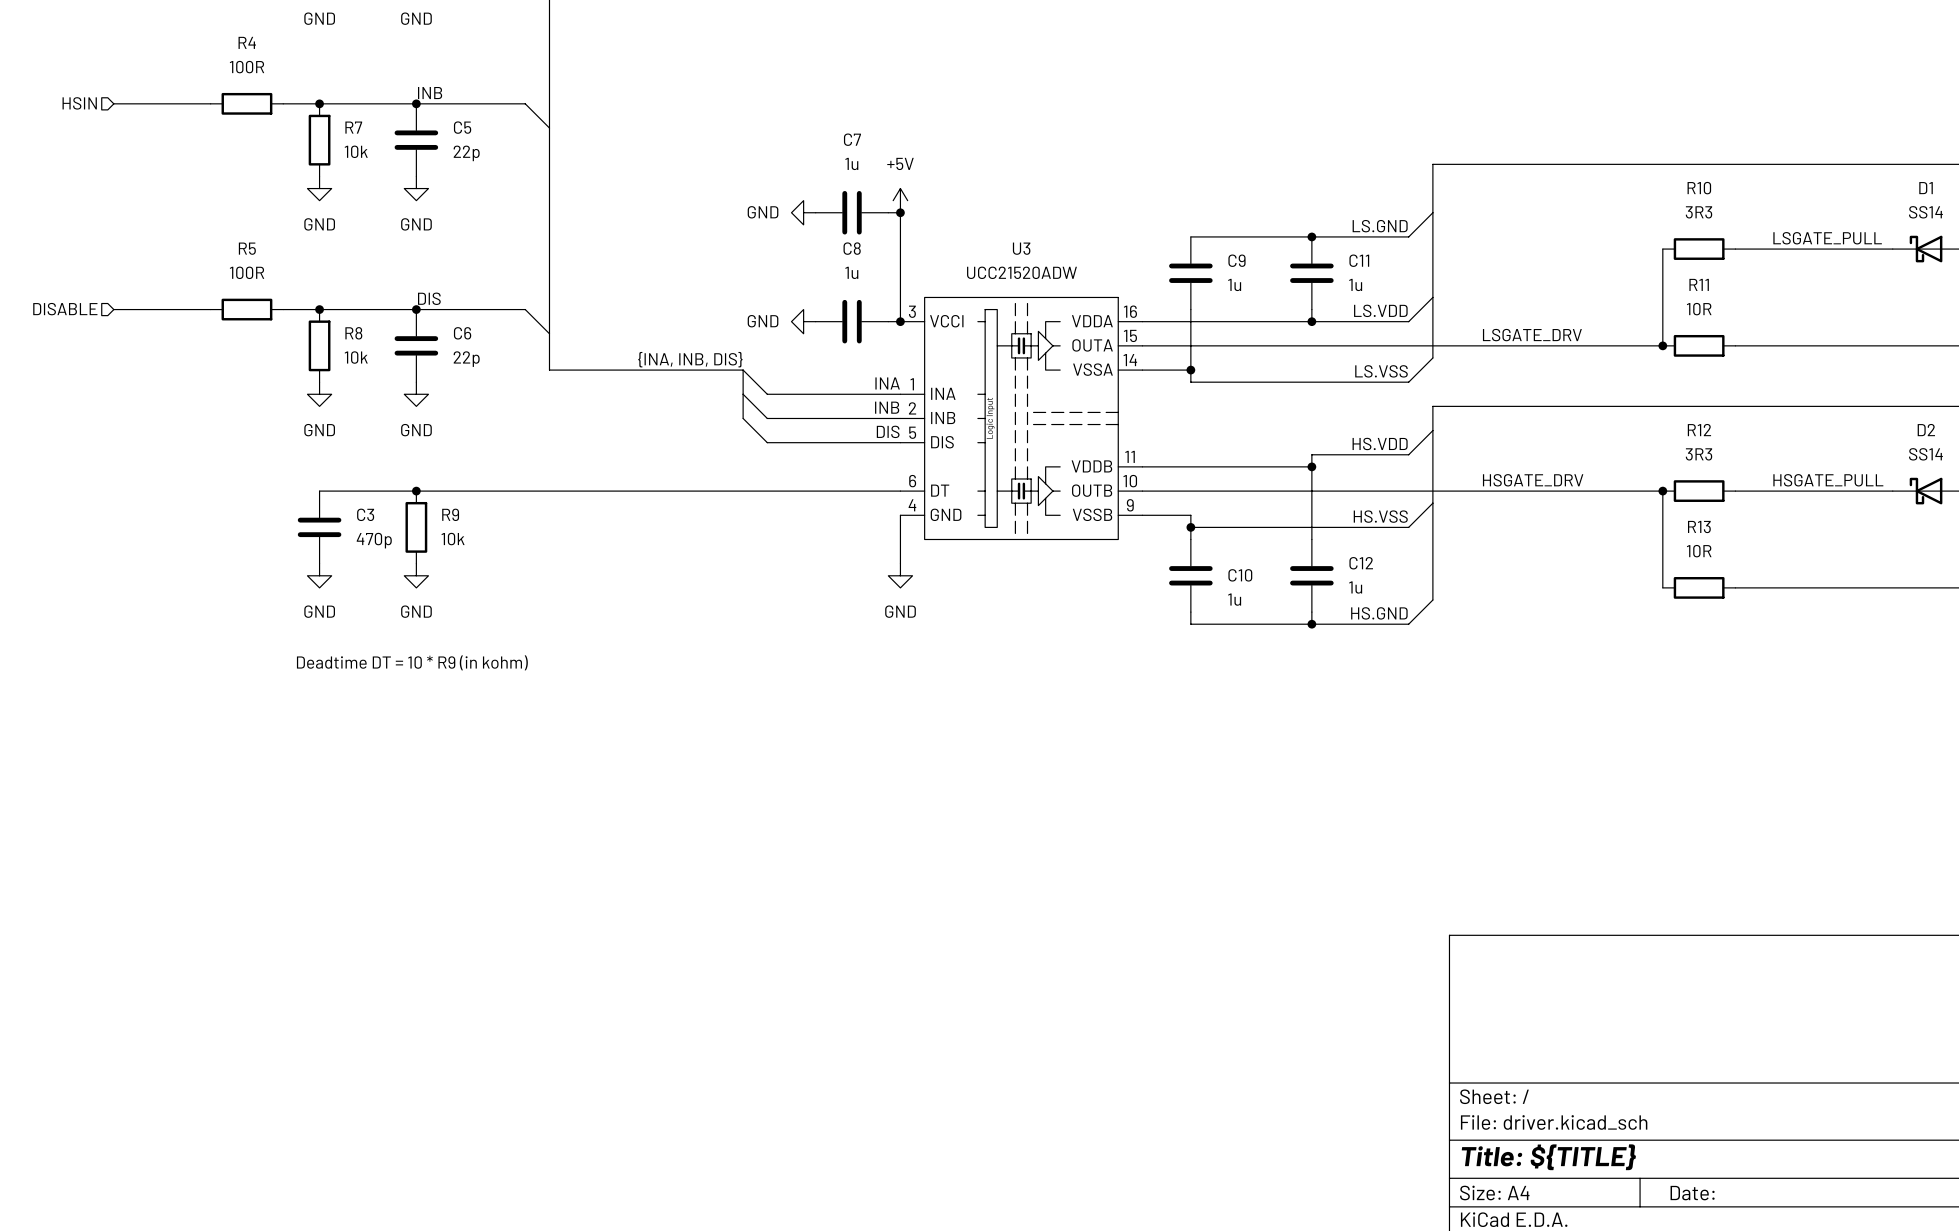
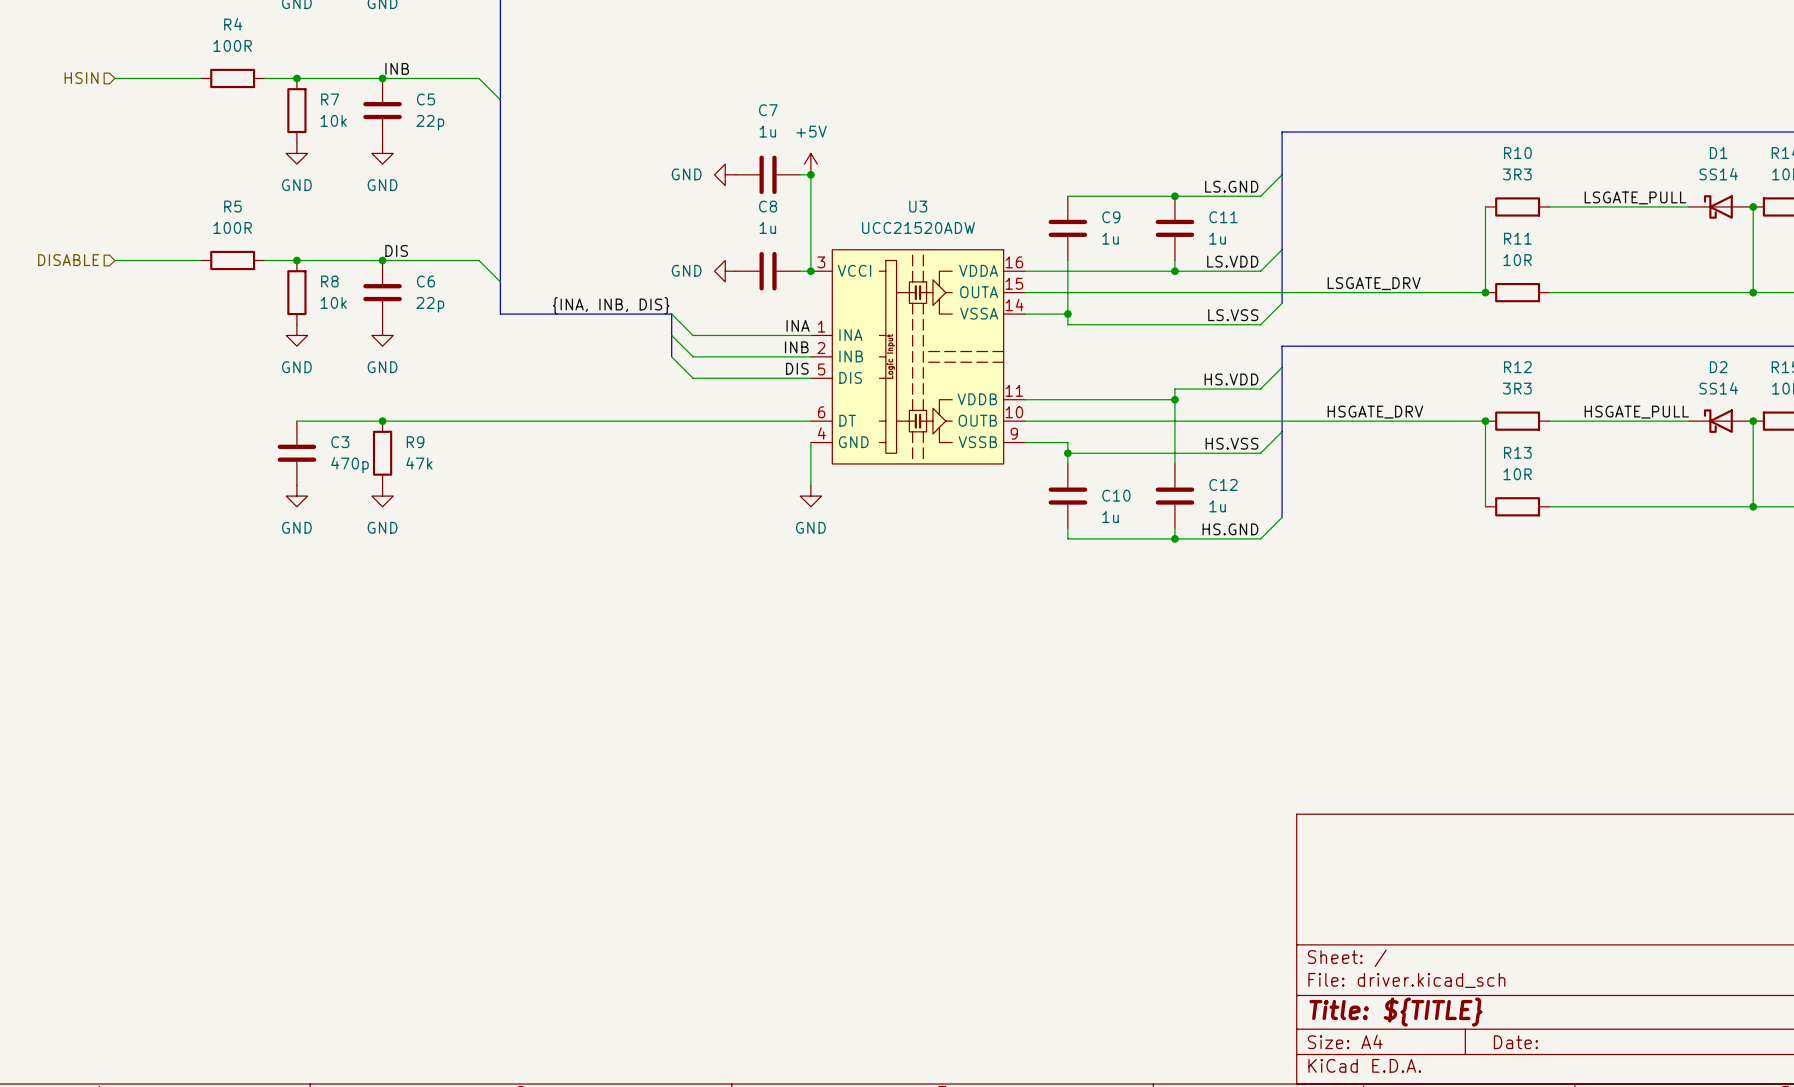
R9 value: 10k (453, 539) -> 47k (419, 463)
text: Deadtime DT = 10 * R9 (in kohm) (412, 662) -> none

